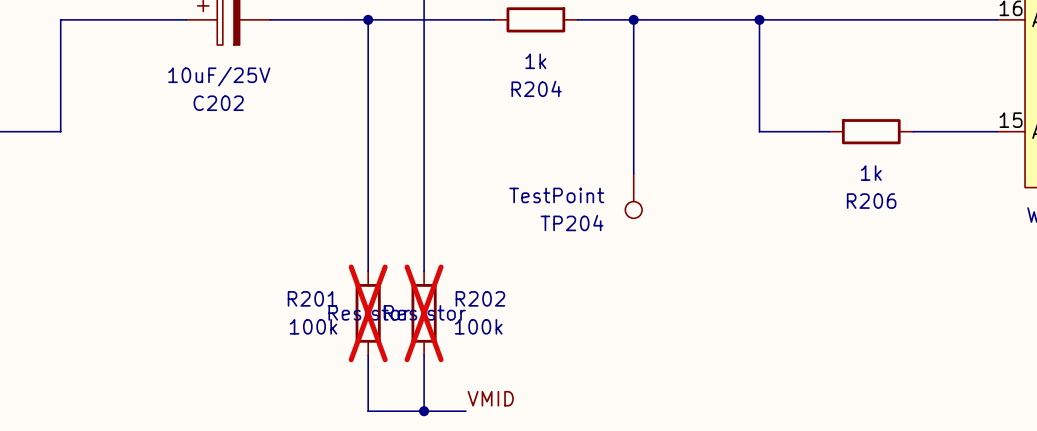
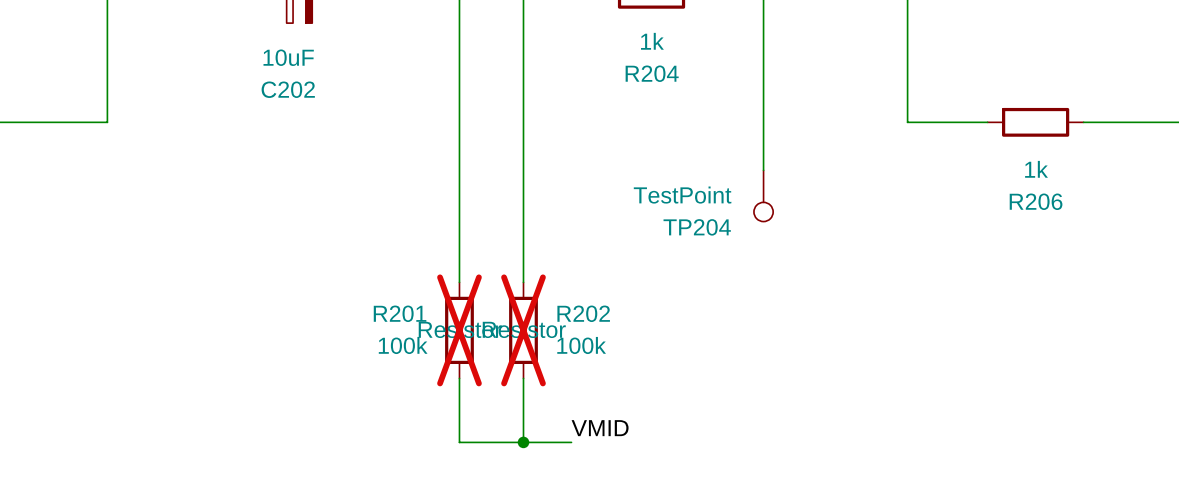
C202 value: 10uF/25V (219, 76) -> 10uF (288, 57)

